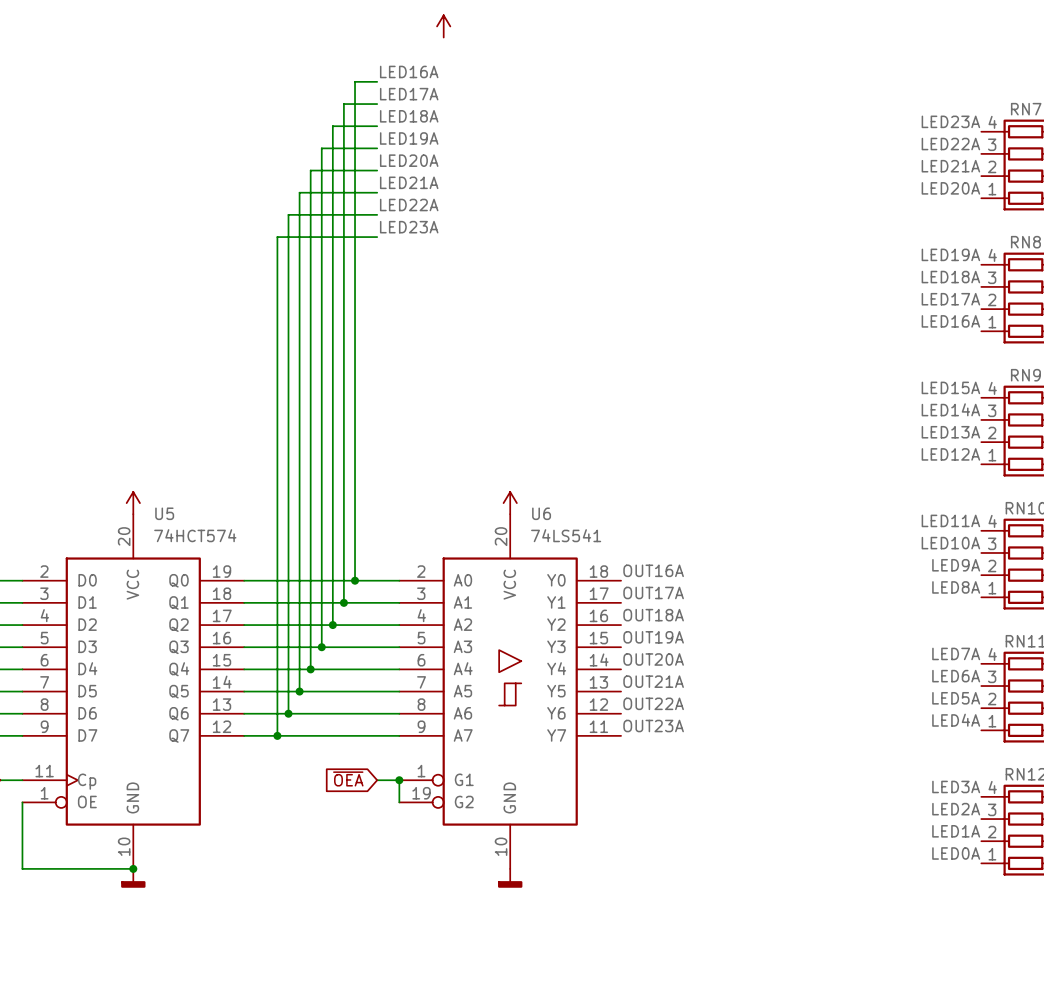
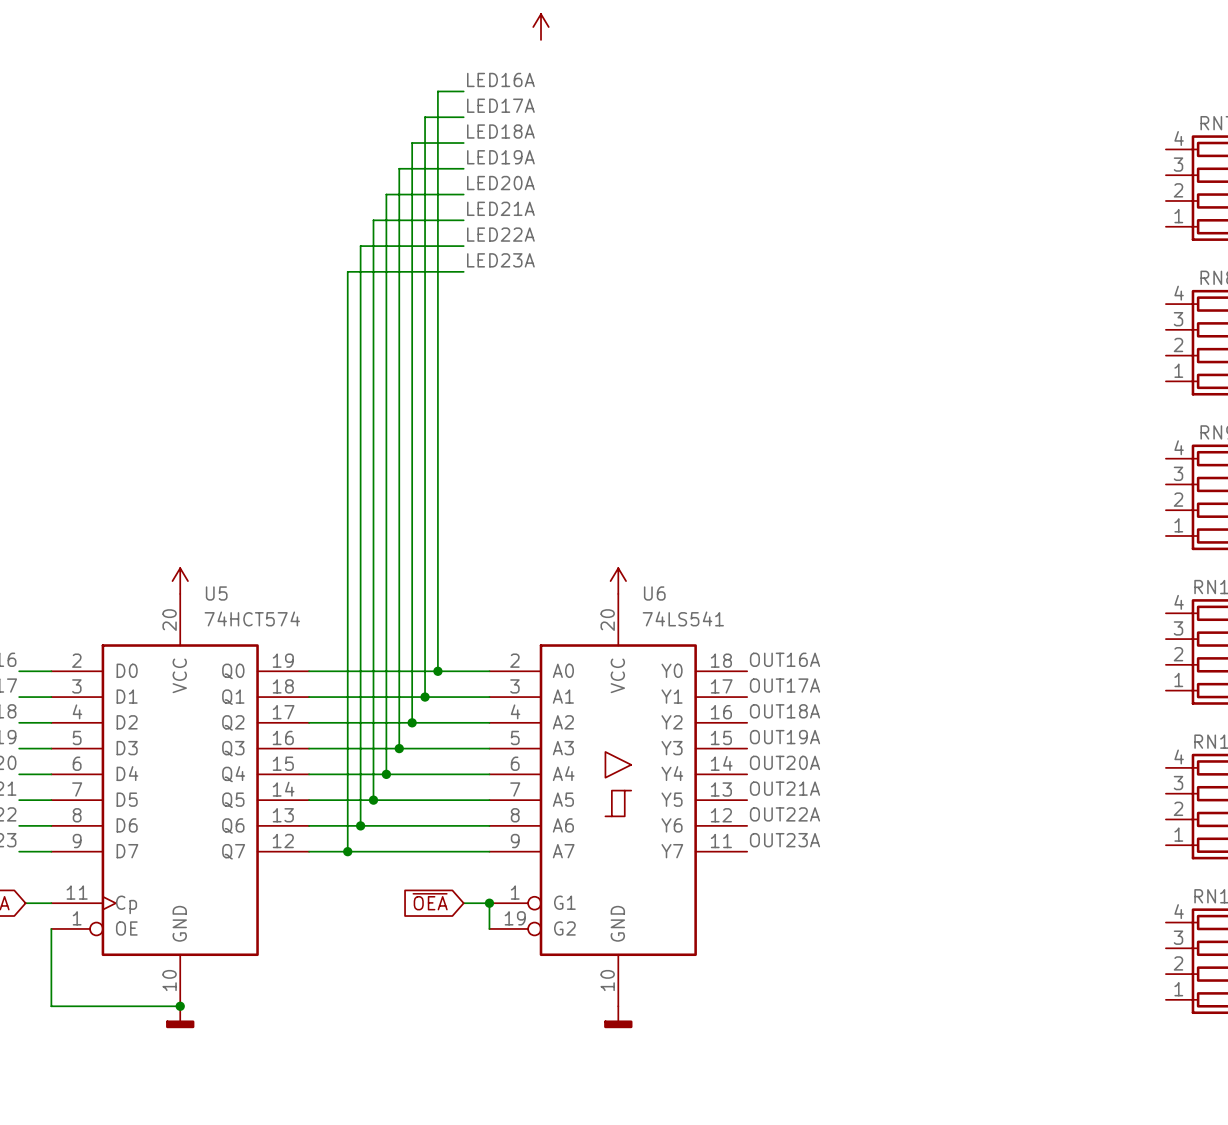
label: LED23A (950, 121) -> none
label: LED22A (950, 144) -> none
label: LED21A (950, 166) -> none
label: LED20A (950, 188) -> none
label: LED19A (950, 254) -> none
label: LED18A (950, 277) -> none
label: LED17A (950, 299) -> none
label: LED16A (950, 321) -> none
label: LED15A (950, 387) -> none
label: LED14A (950, 409) -> none
label: LED13A (950, 432) -> none
label: LED12A (950, 454) -> none
label: LED11A (950, 520) -> none
label: LED10A (950, 543) -> none
label: LED9A (956, 565) -> none
label: LED8A (956, 587) -> none
label: LED7A (956, 653) -> none
label: LED6A (956, 676) -> none
label: LED5A (956, 698) -> none
label: LED4A (956, 720) -> none
label: LED3A (956, 786) -> none
label: LED2A (956, 809) -> none
label: LED1A (956, 831) -> none
label: LED0A (956, 853) -> none

